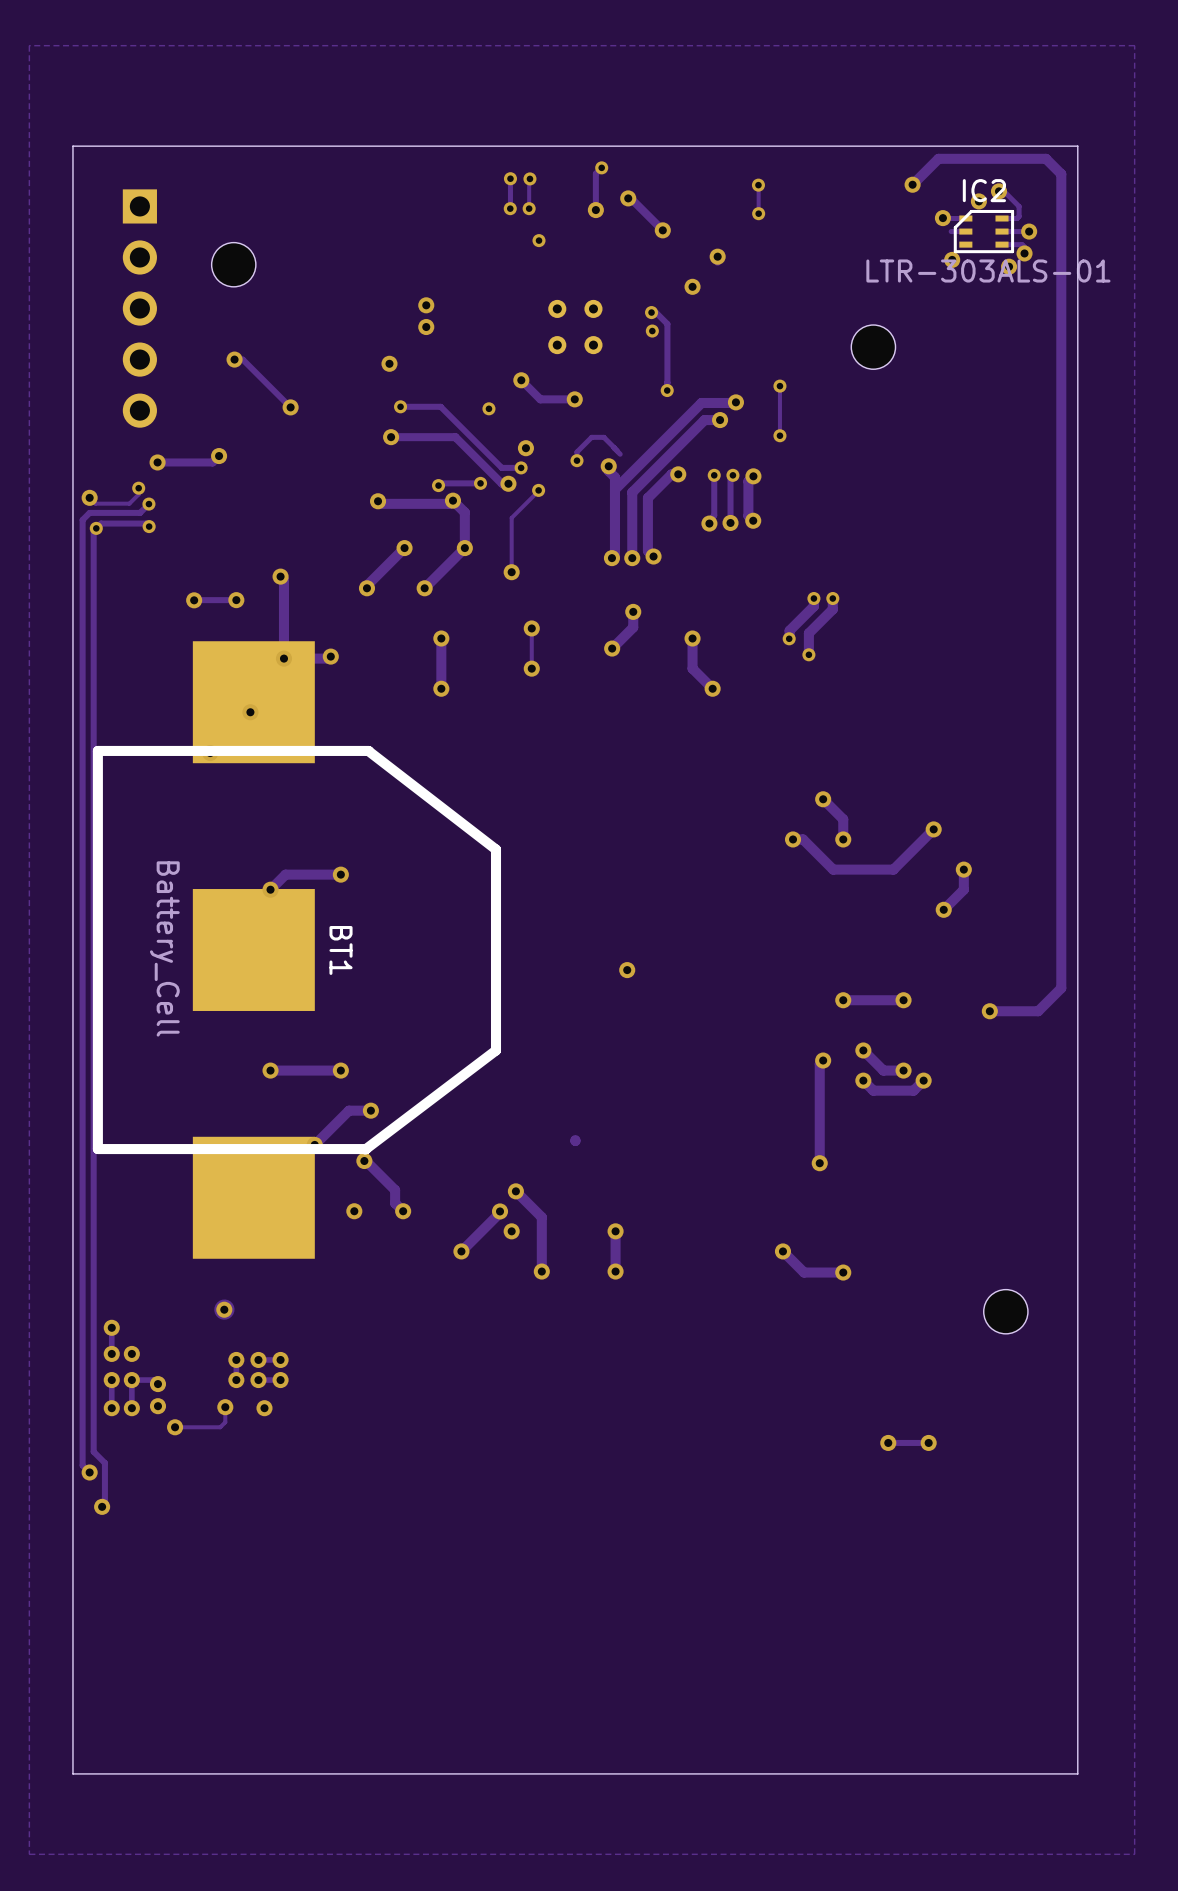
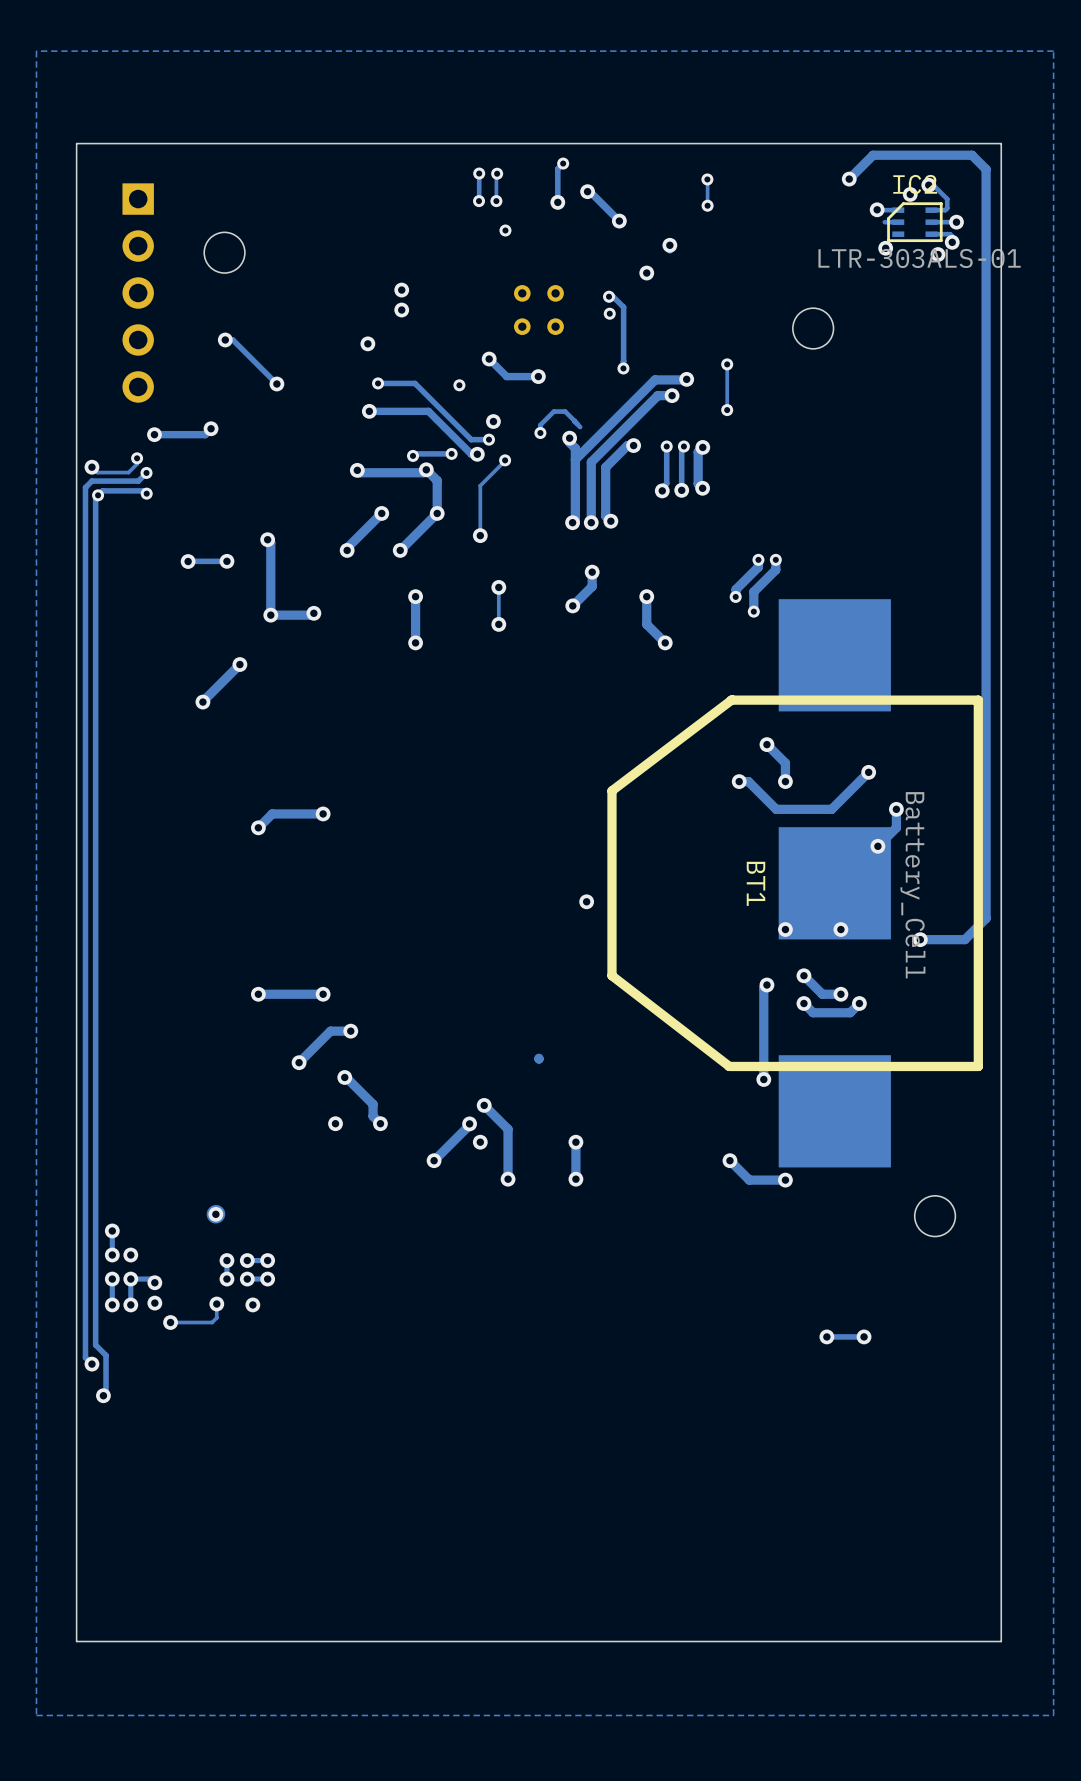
BT1 rotation: 0° (296, 950) -> 180° (795, 883)
BT1 position: (296, 950) -> (795, 883)

